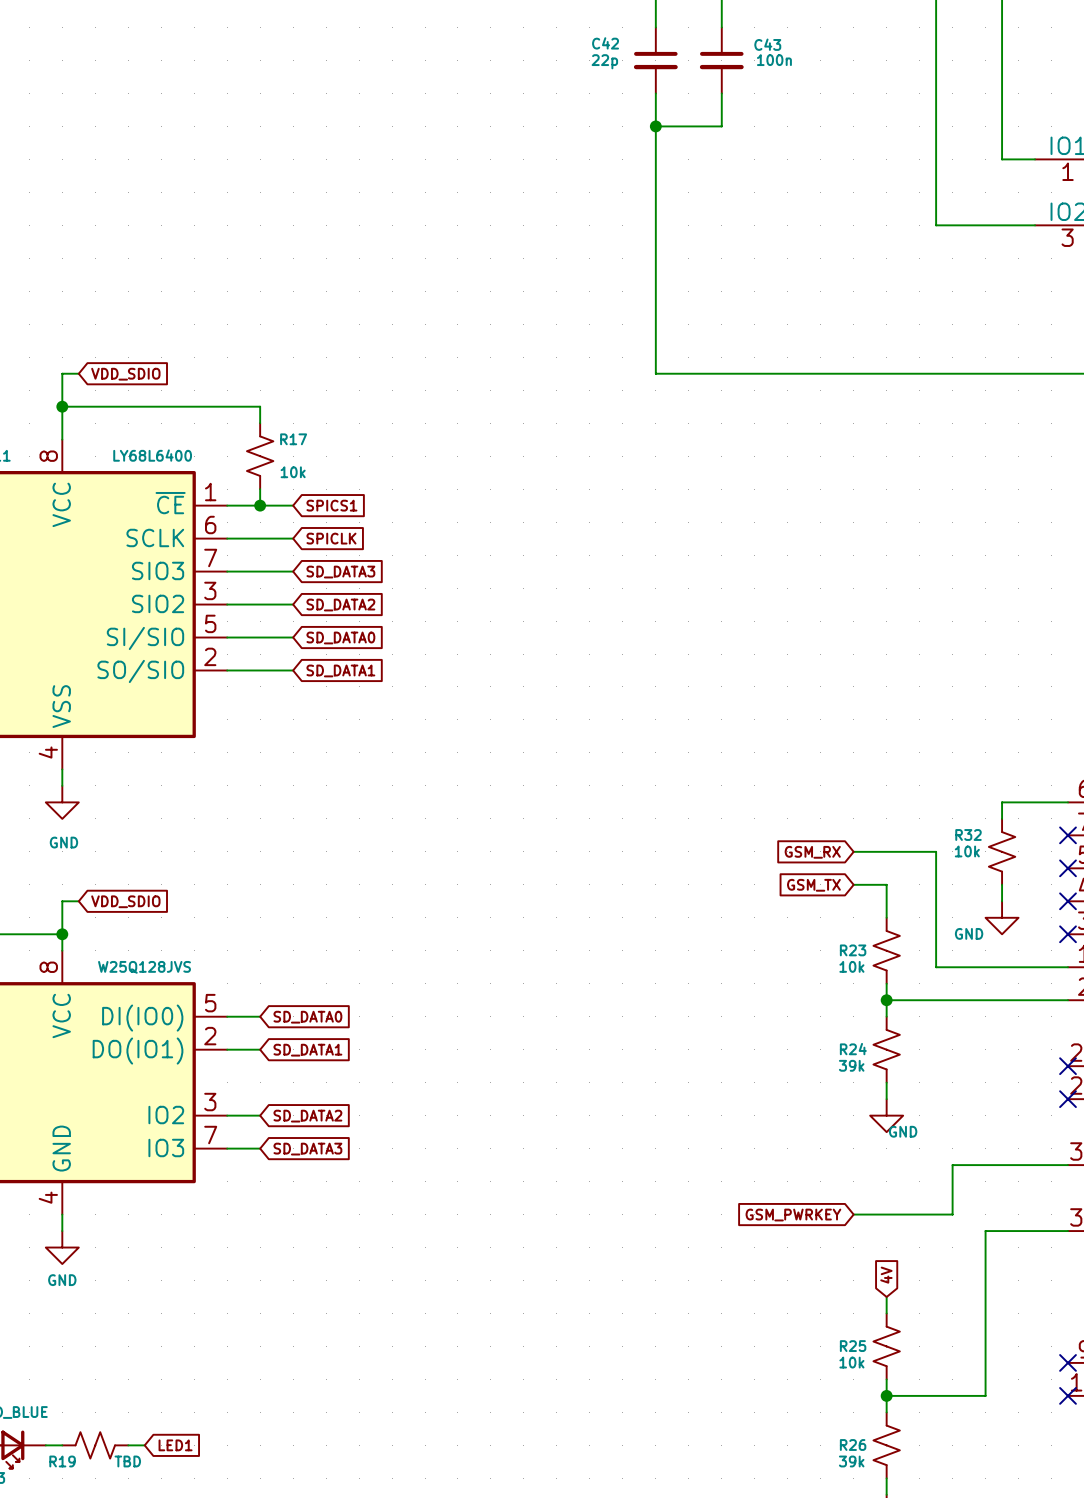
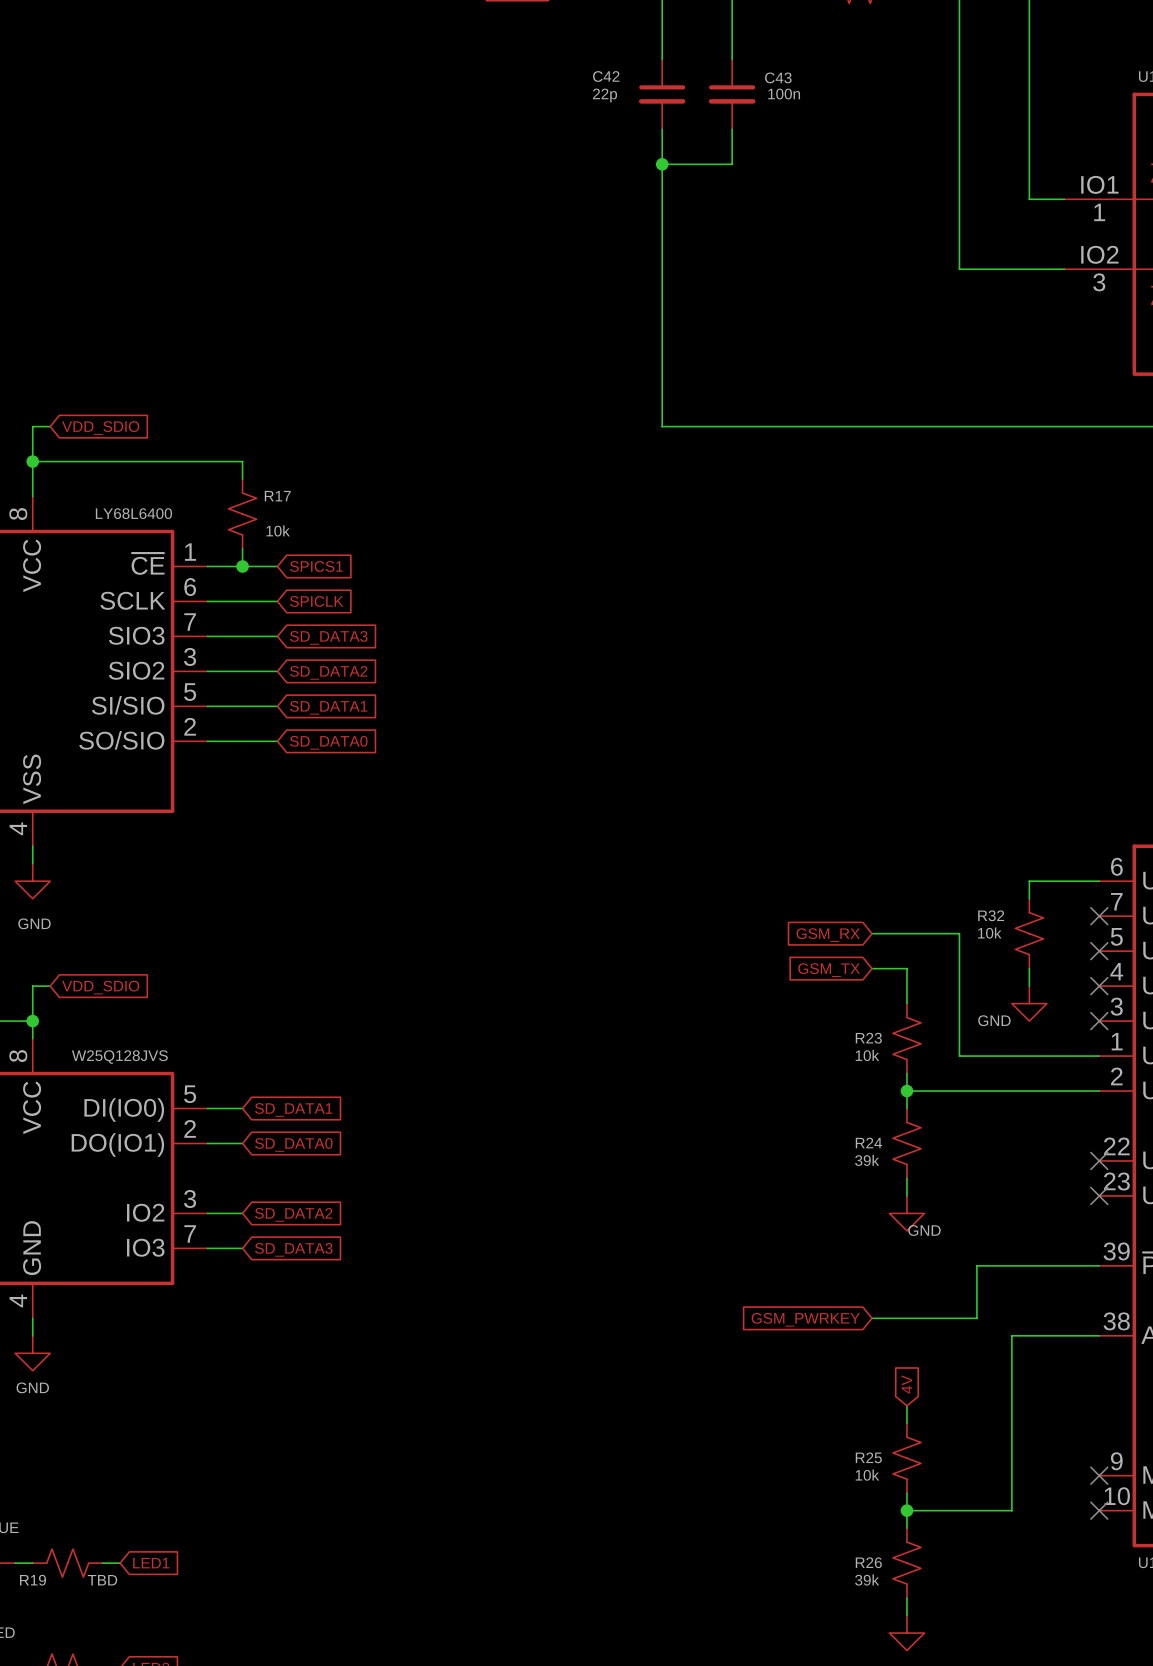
global label: SD_DATA0 (340, 637) -> SD_DATA1 (328, 707)
global label: SD_DATA1 (340, 670) -> SD_DATA0 (328, 742)
global label: SD_DATA0 (307, 1017) -> SD_DATA1 (293, 1109)
global label: SD_DATA1 (307, 1050) -> SD_DATA0 (293, 1144)

